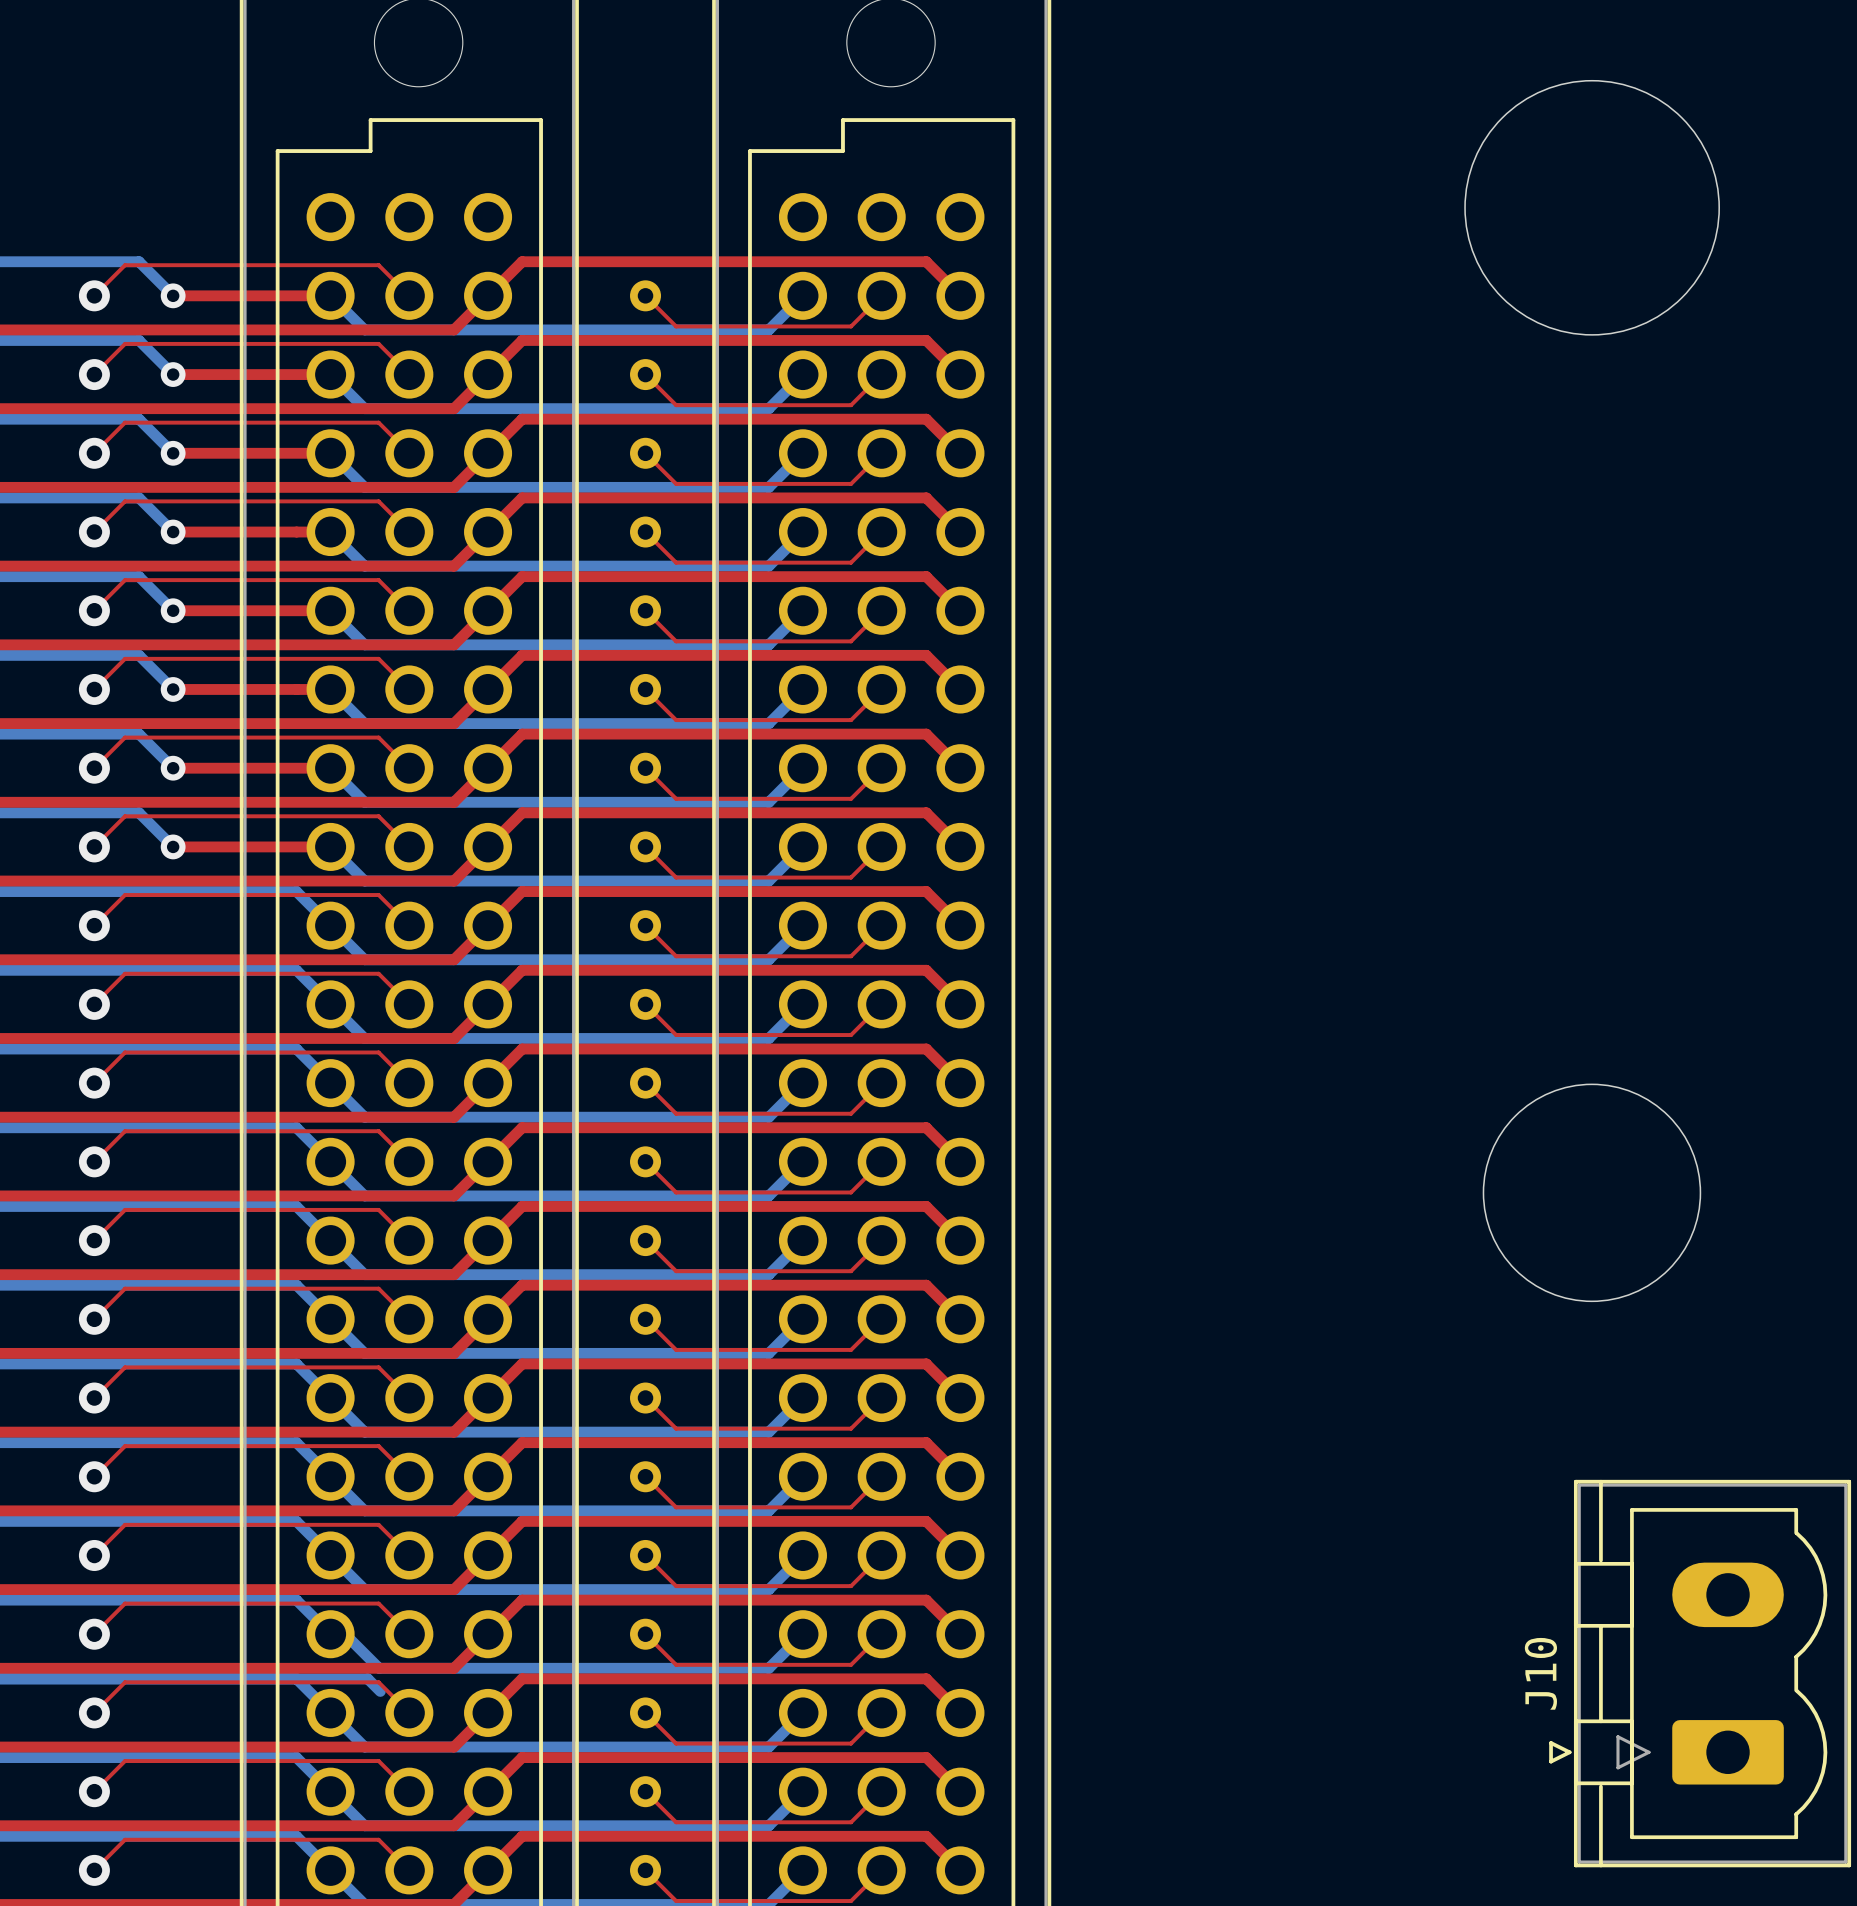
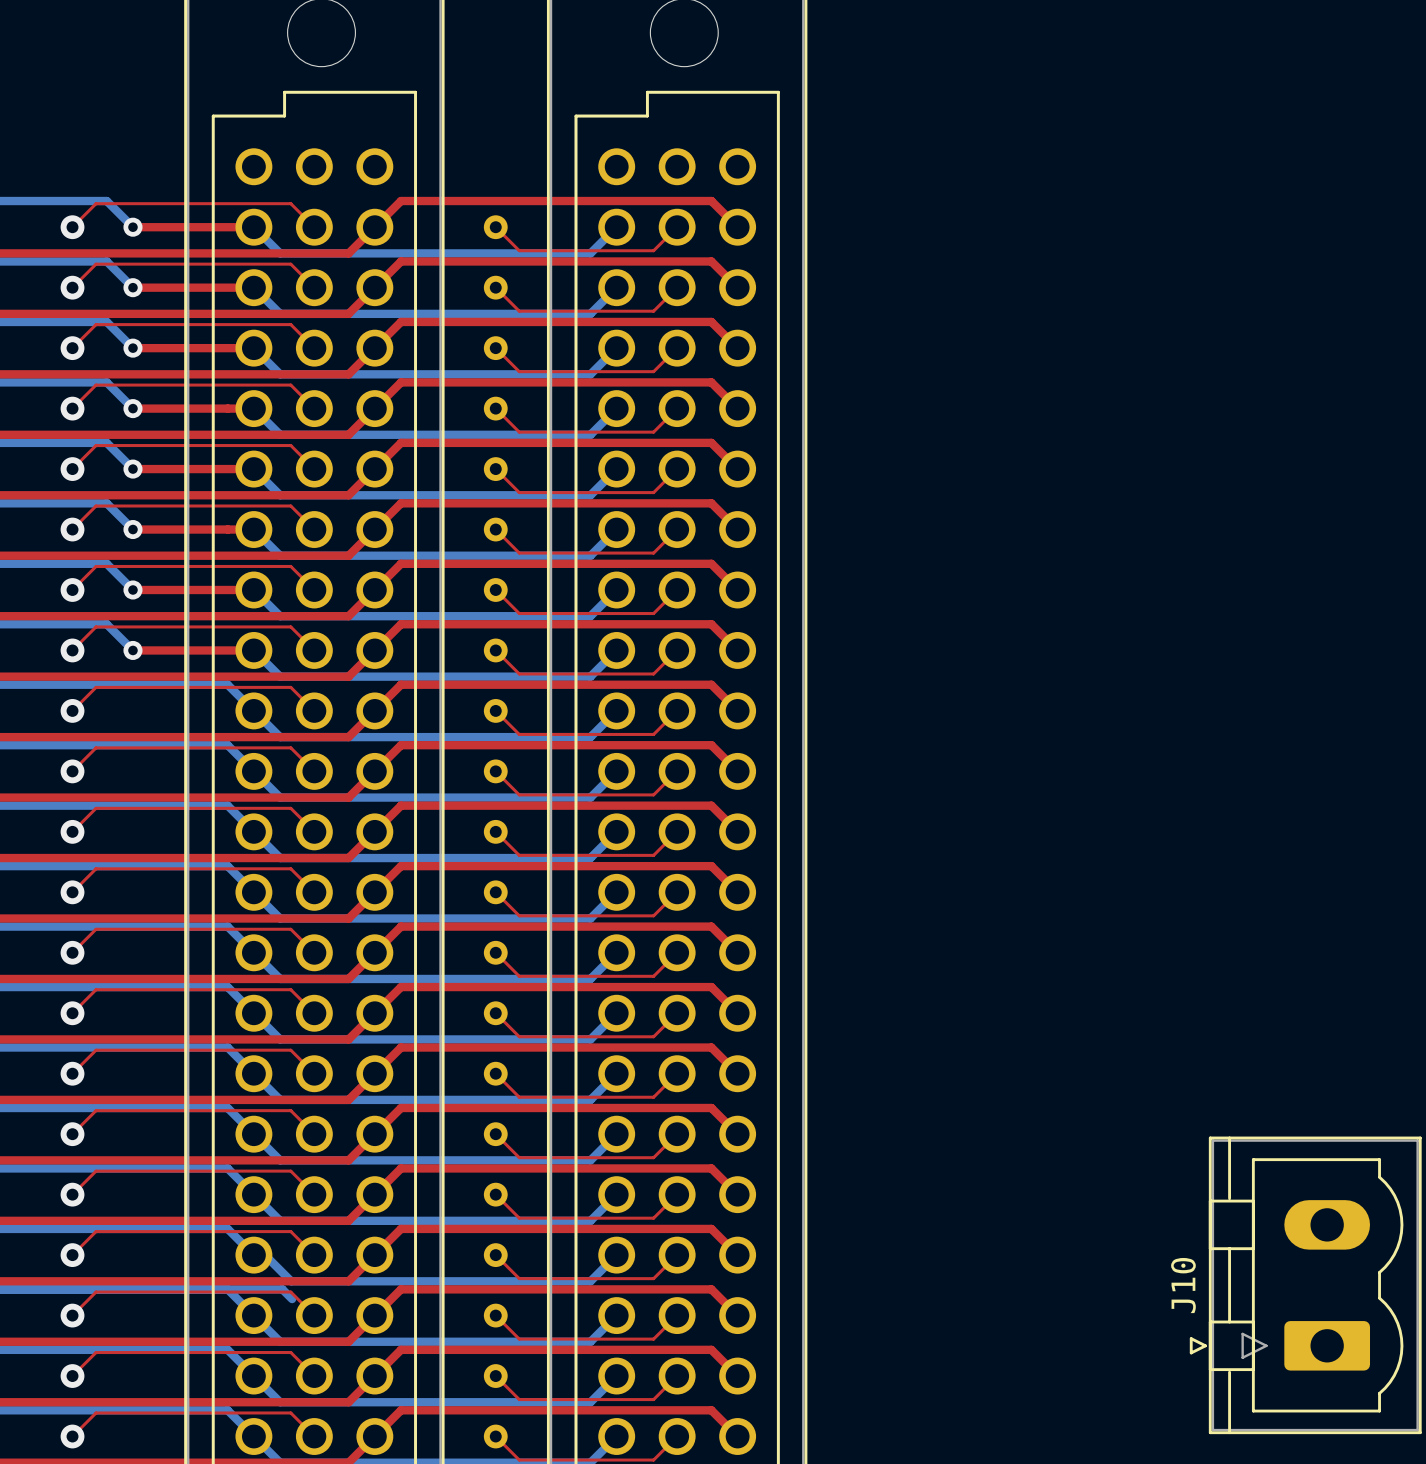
round board edge: [1464, 79, 1720, 336] -> none
round board edge: [1482, 1083, 1702, 1303] -> none

